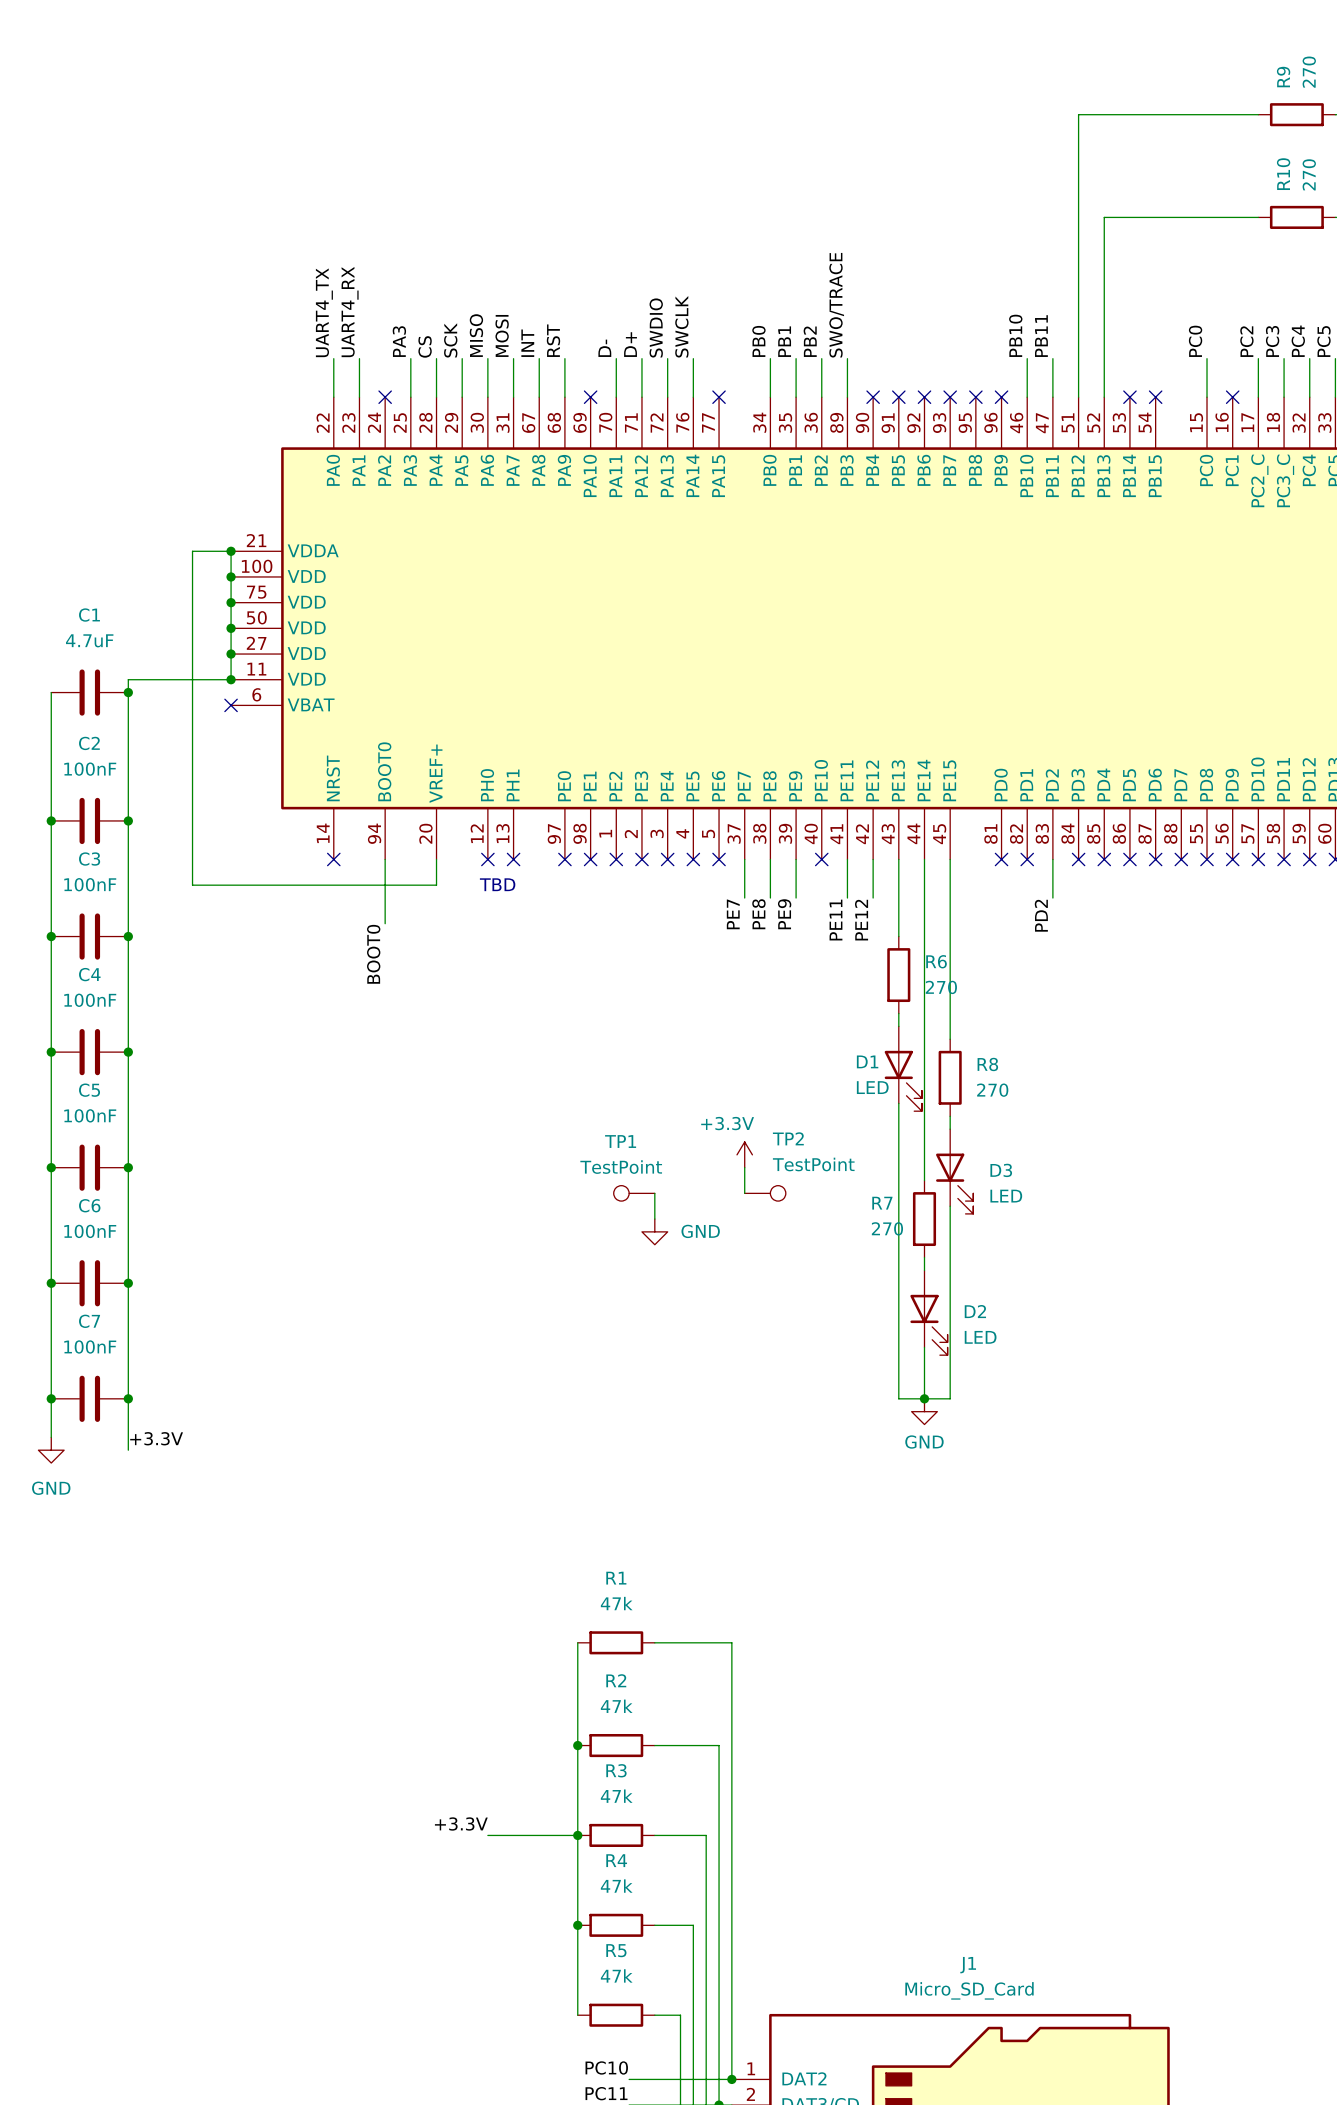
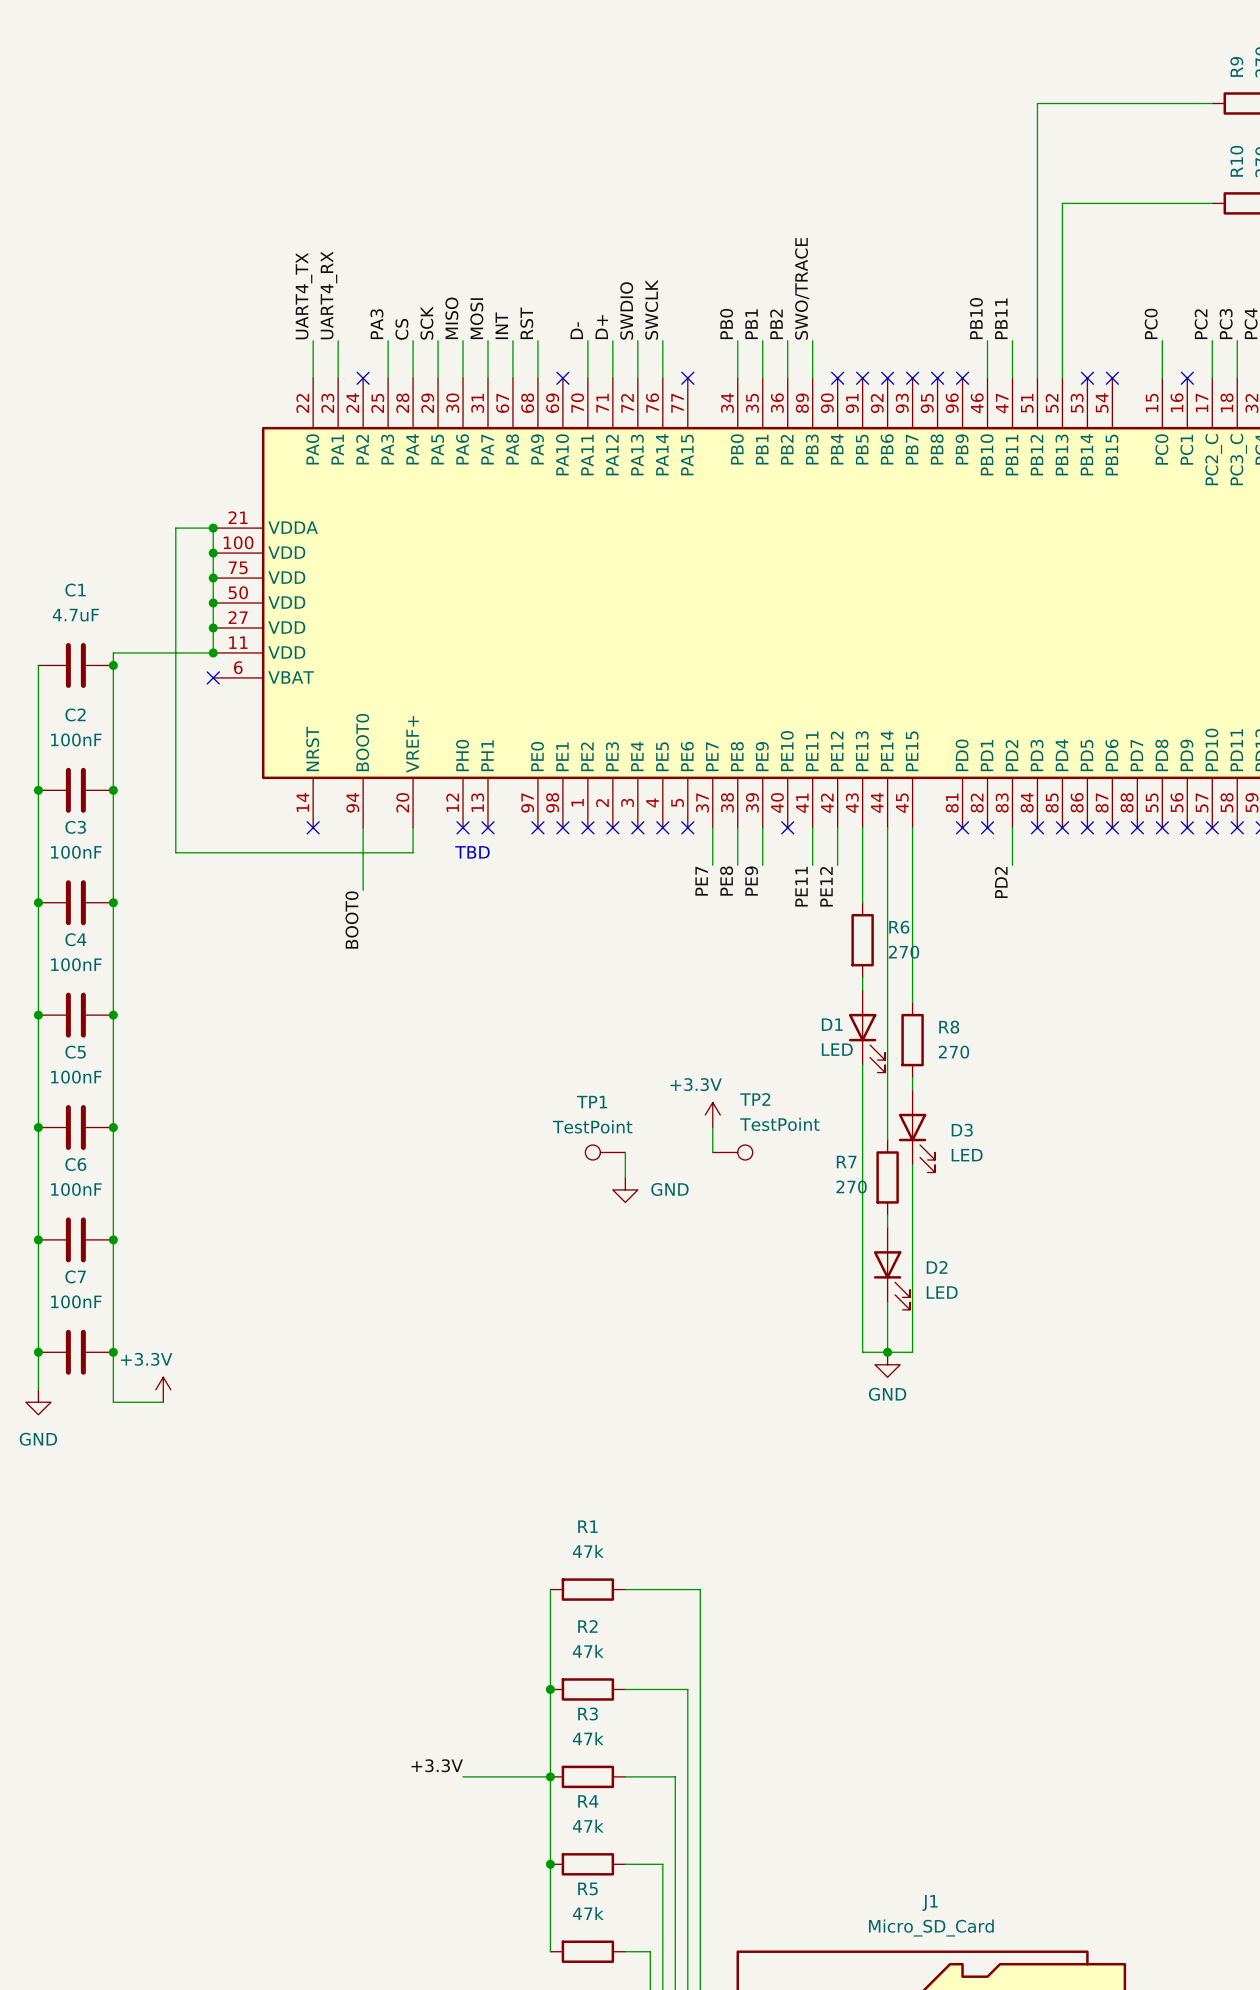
power symbol: none -> +3.3V (163, 1389)
label: +3.3V (156, 1438) -> none
wire: none -> (113, 1402) (163, 1402)

